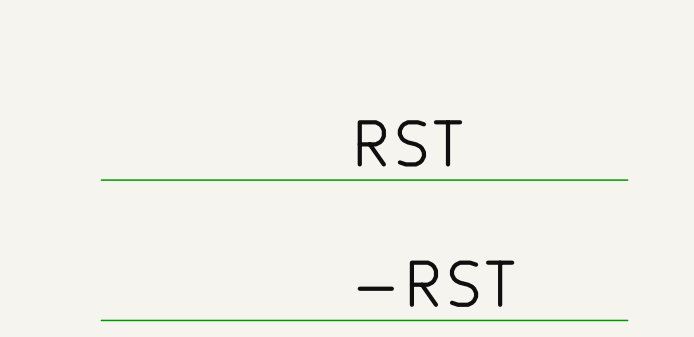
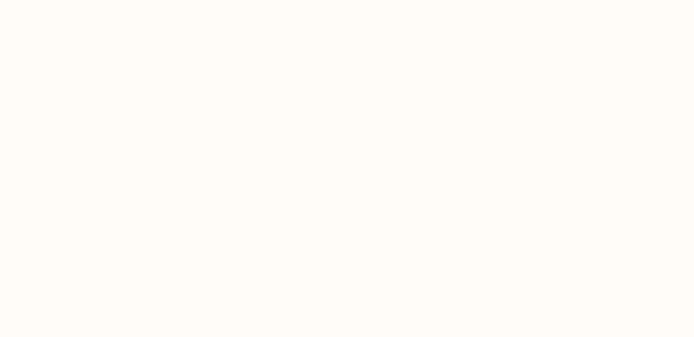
label: RST (409, 143) -> none
wire: (101, 180) (627, 180) -> none
label: -RST (435, 283) -> none
wire: (101, 320) (627, 320) -> none

